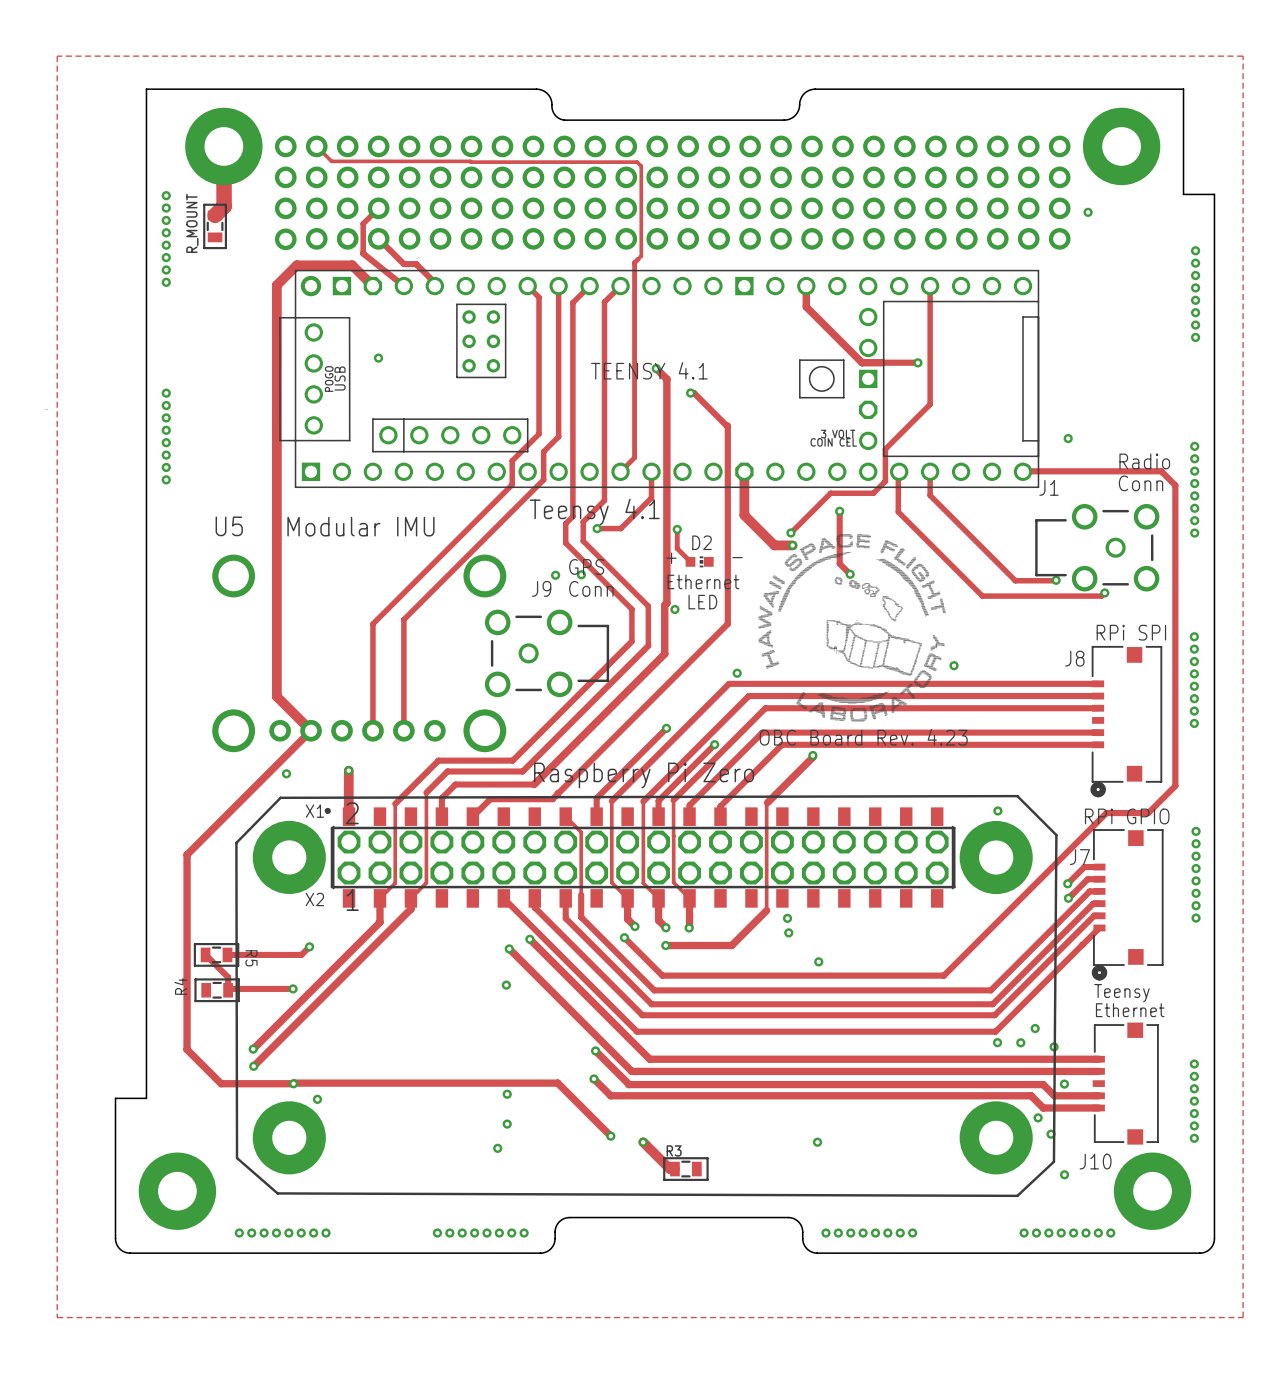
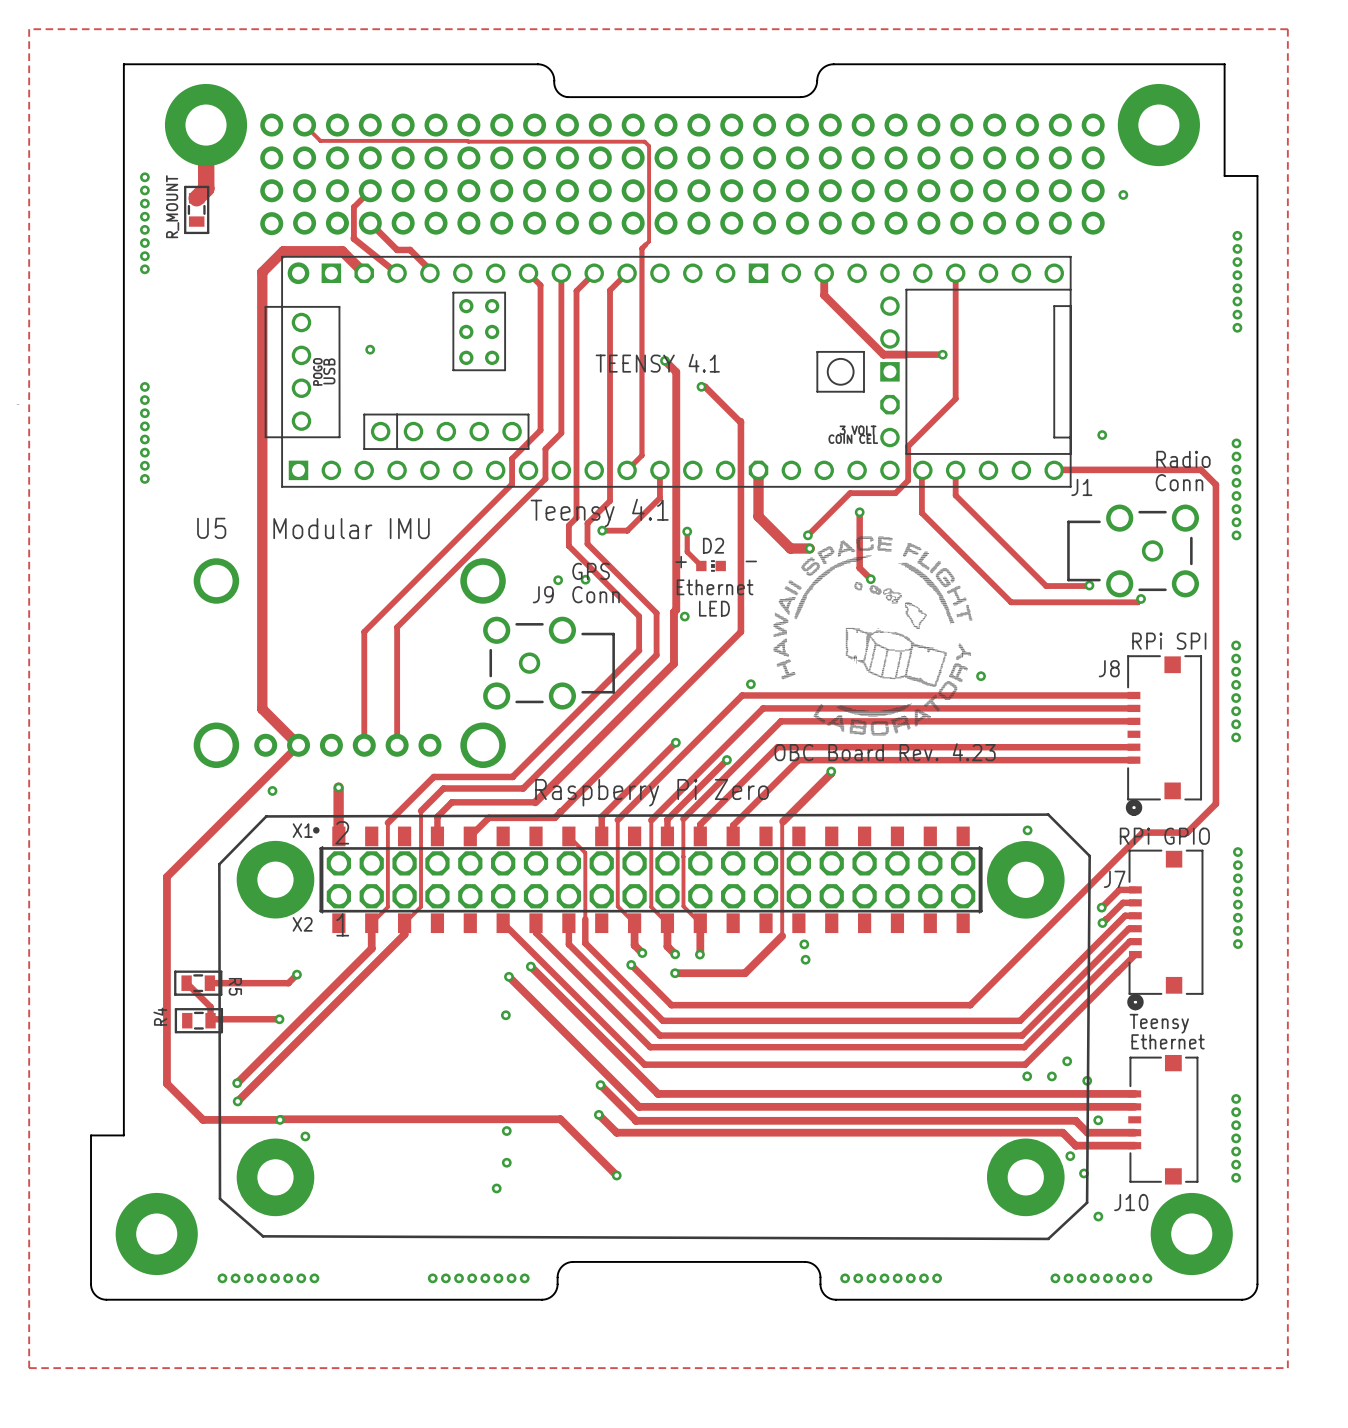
via: (818, 961) -> none
track: (643, 1142) (670, 1169) (674, 1169) -> none
via: (643, 1142) -> none
via: (817, 1142) -> none
R3: (685, 1169) -> none

